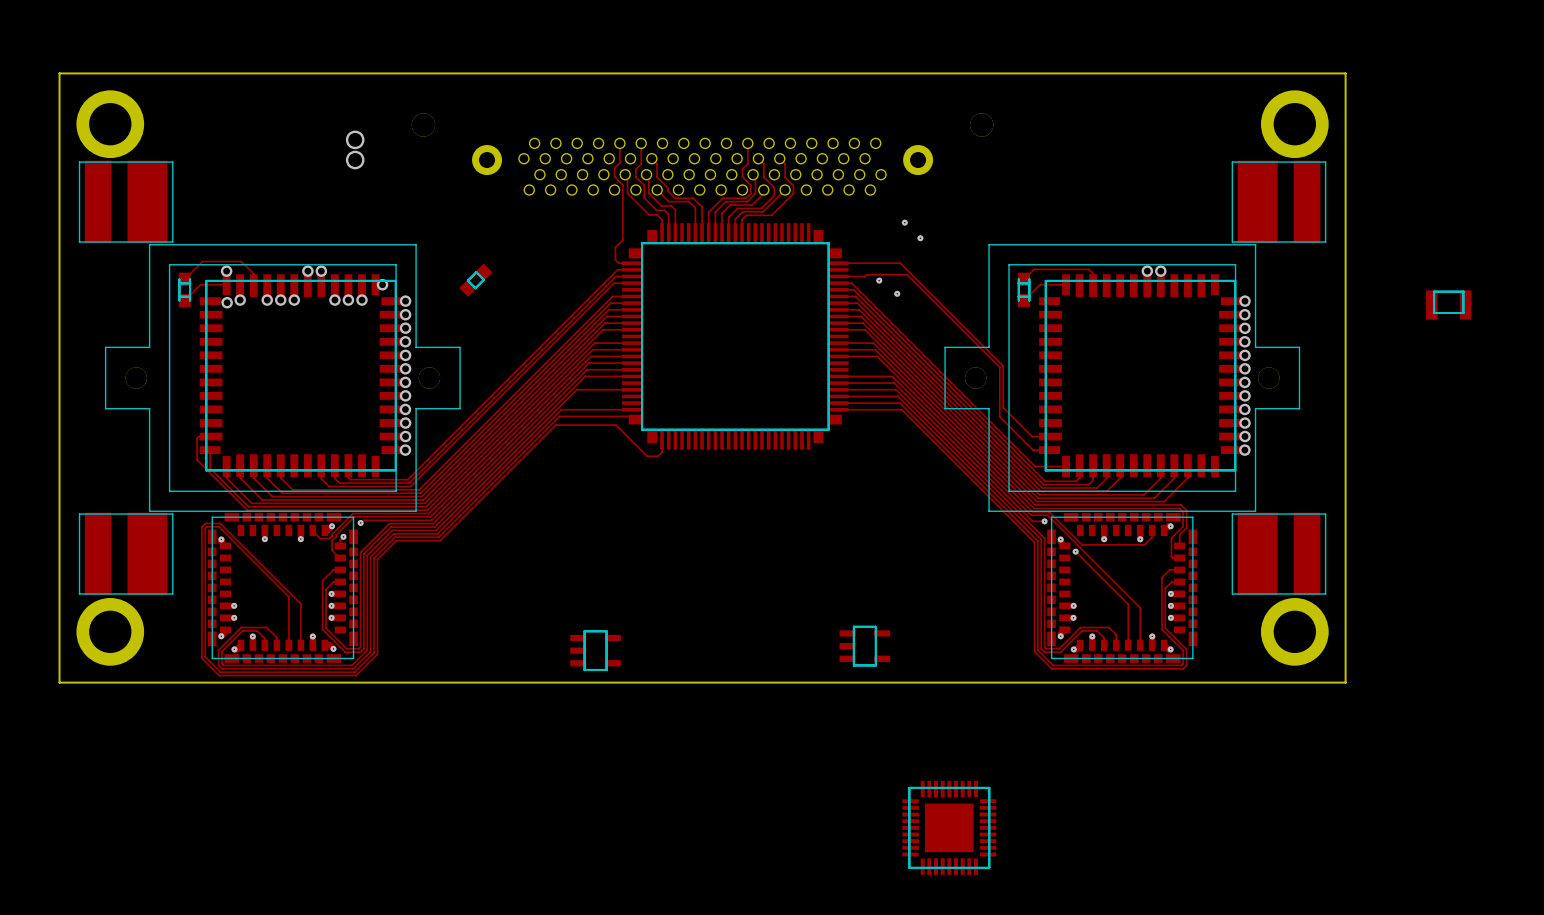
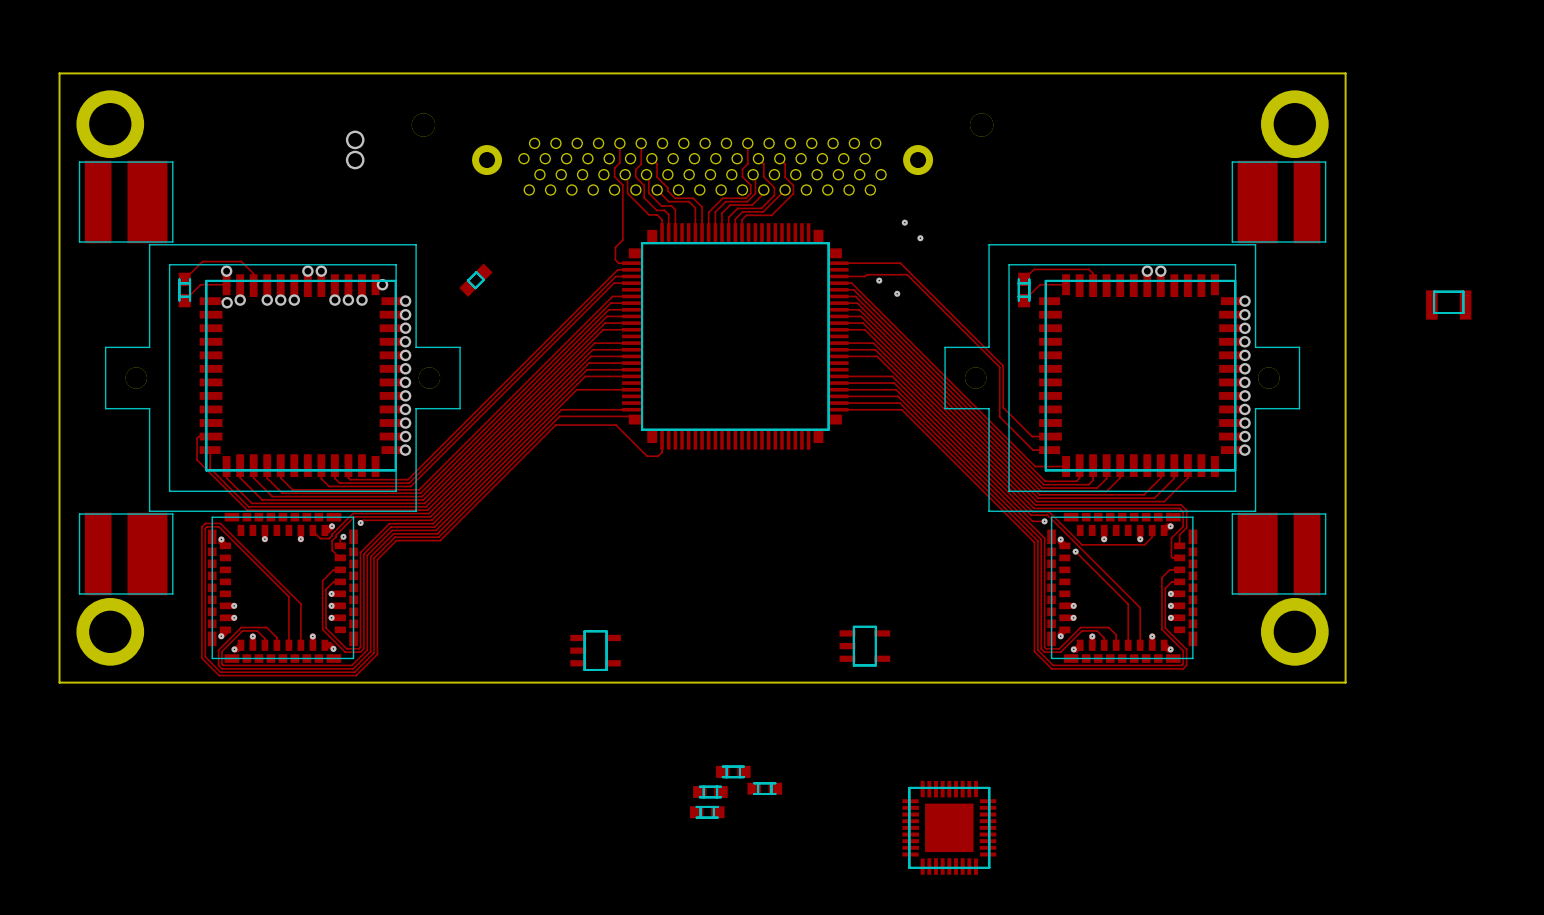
part: none -> (733, 771)
part: none -> (764, 788)
part: none -> (710, 792)
part: none -> (707, 812)

